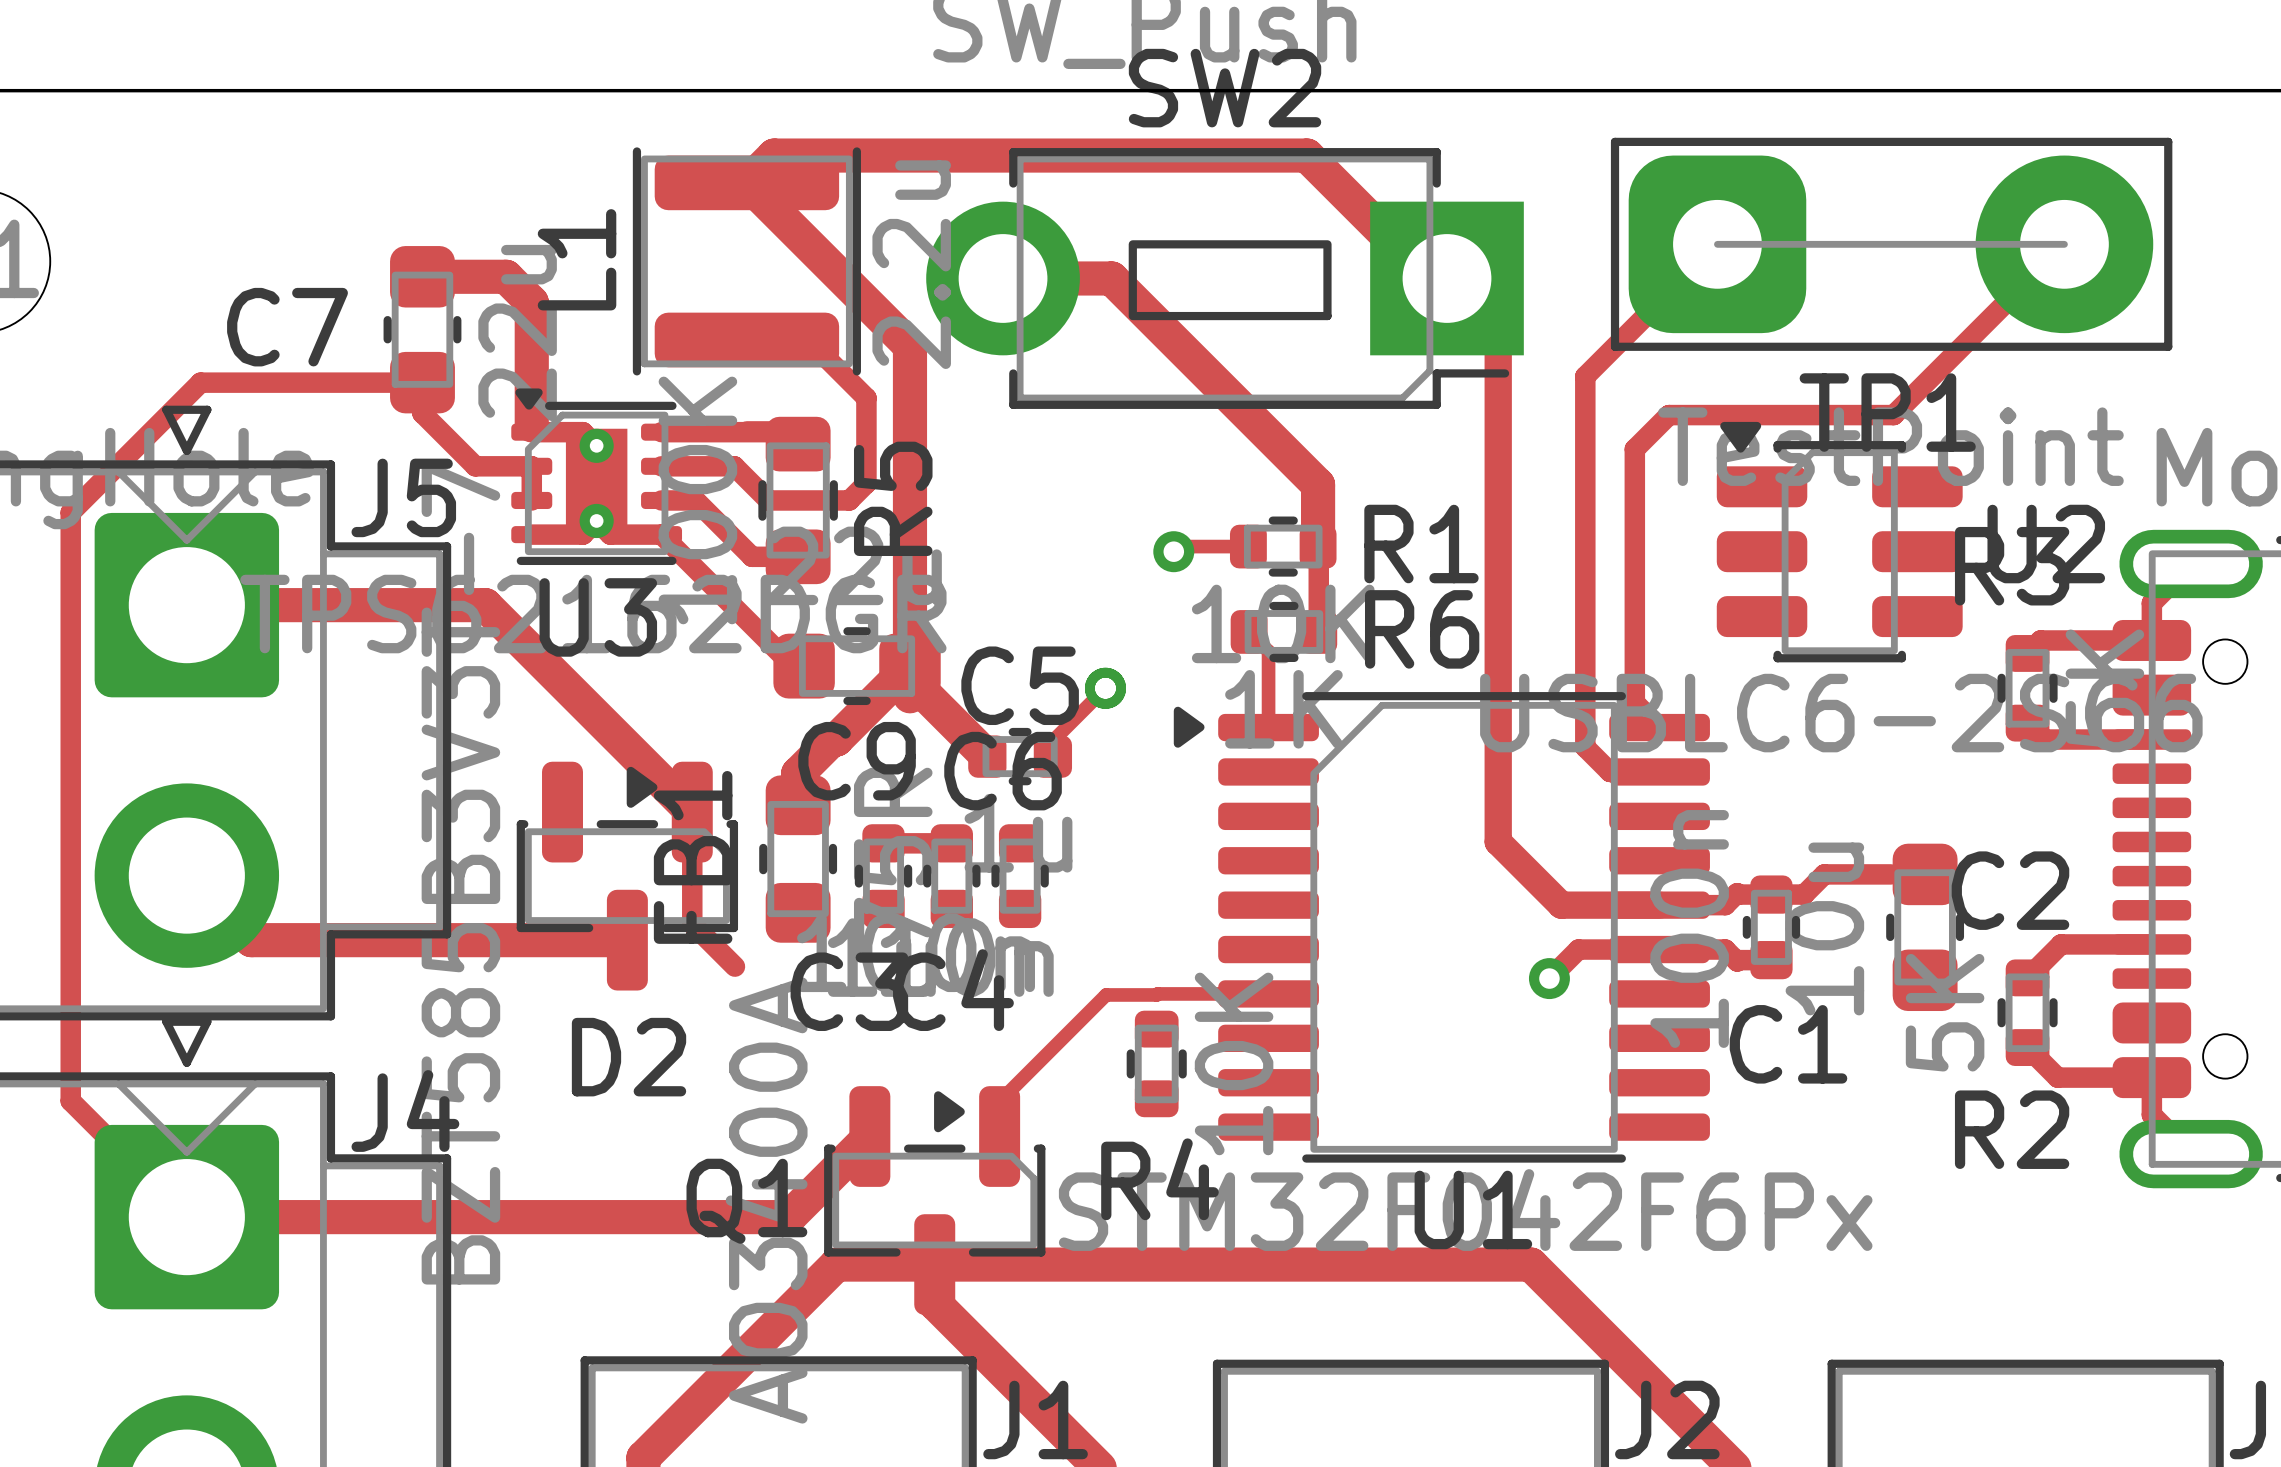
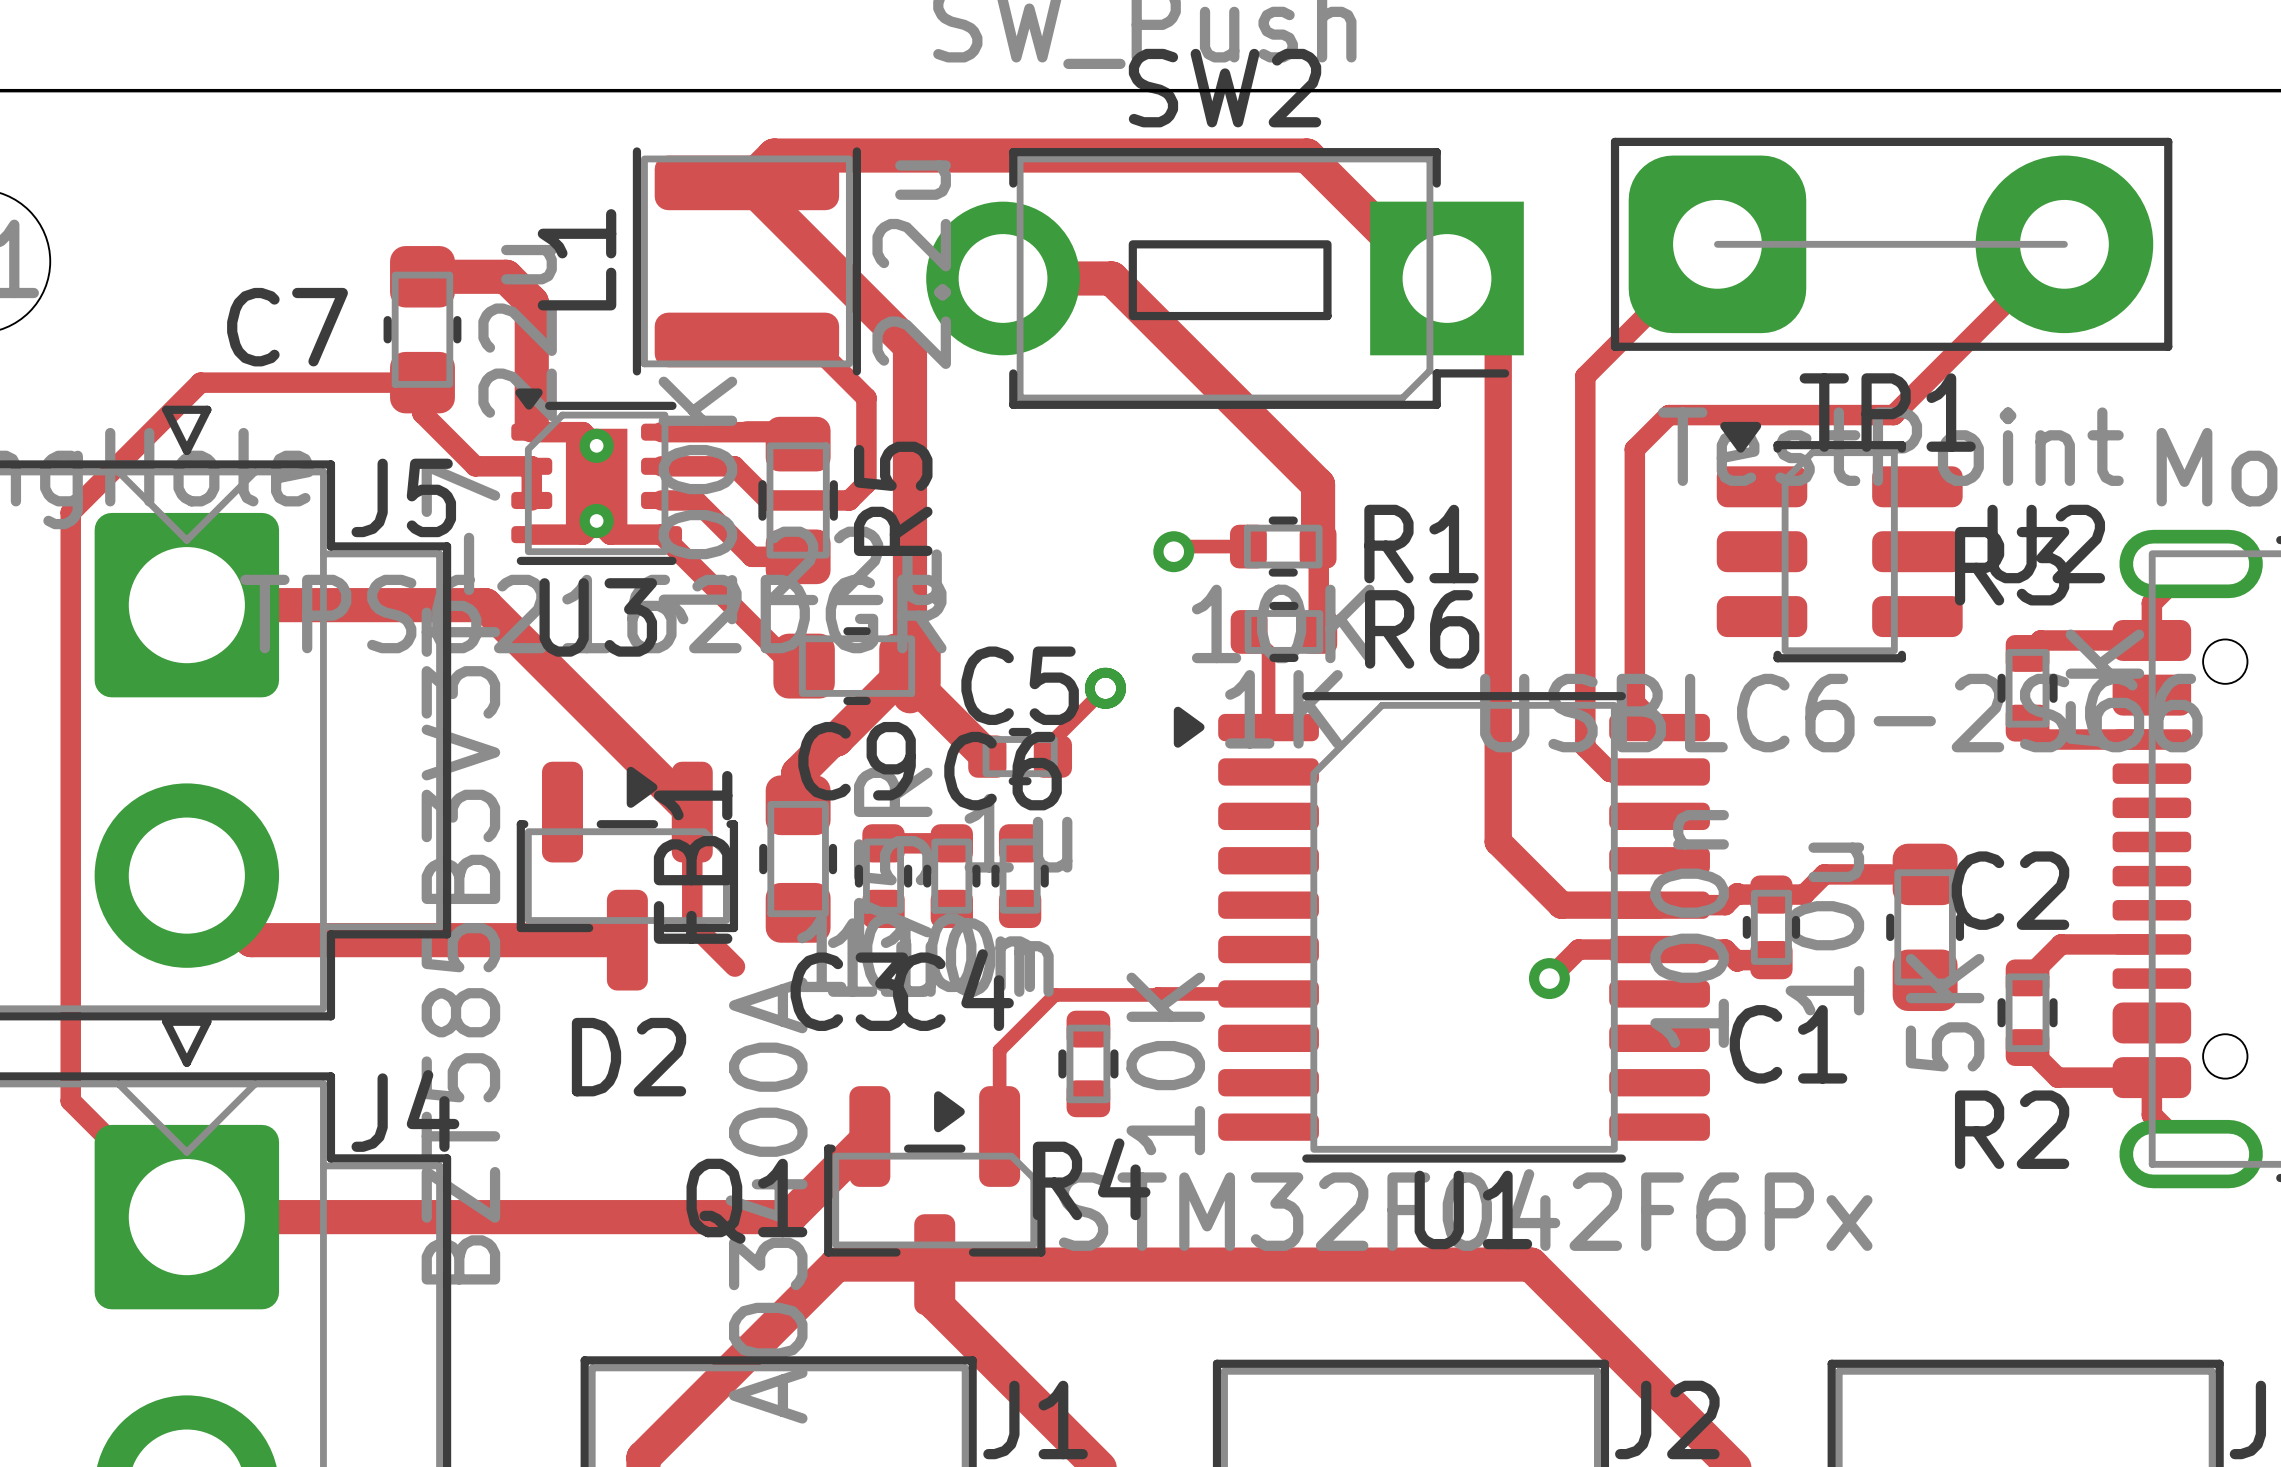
track: (1106, 994) (999, 1101) -> (1106, 994) (1054, 994) (999, 1050) (999, 1101)
R4 position: (1156, 1063) -> (1088, 1063)

